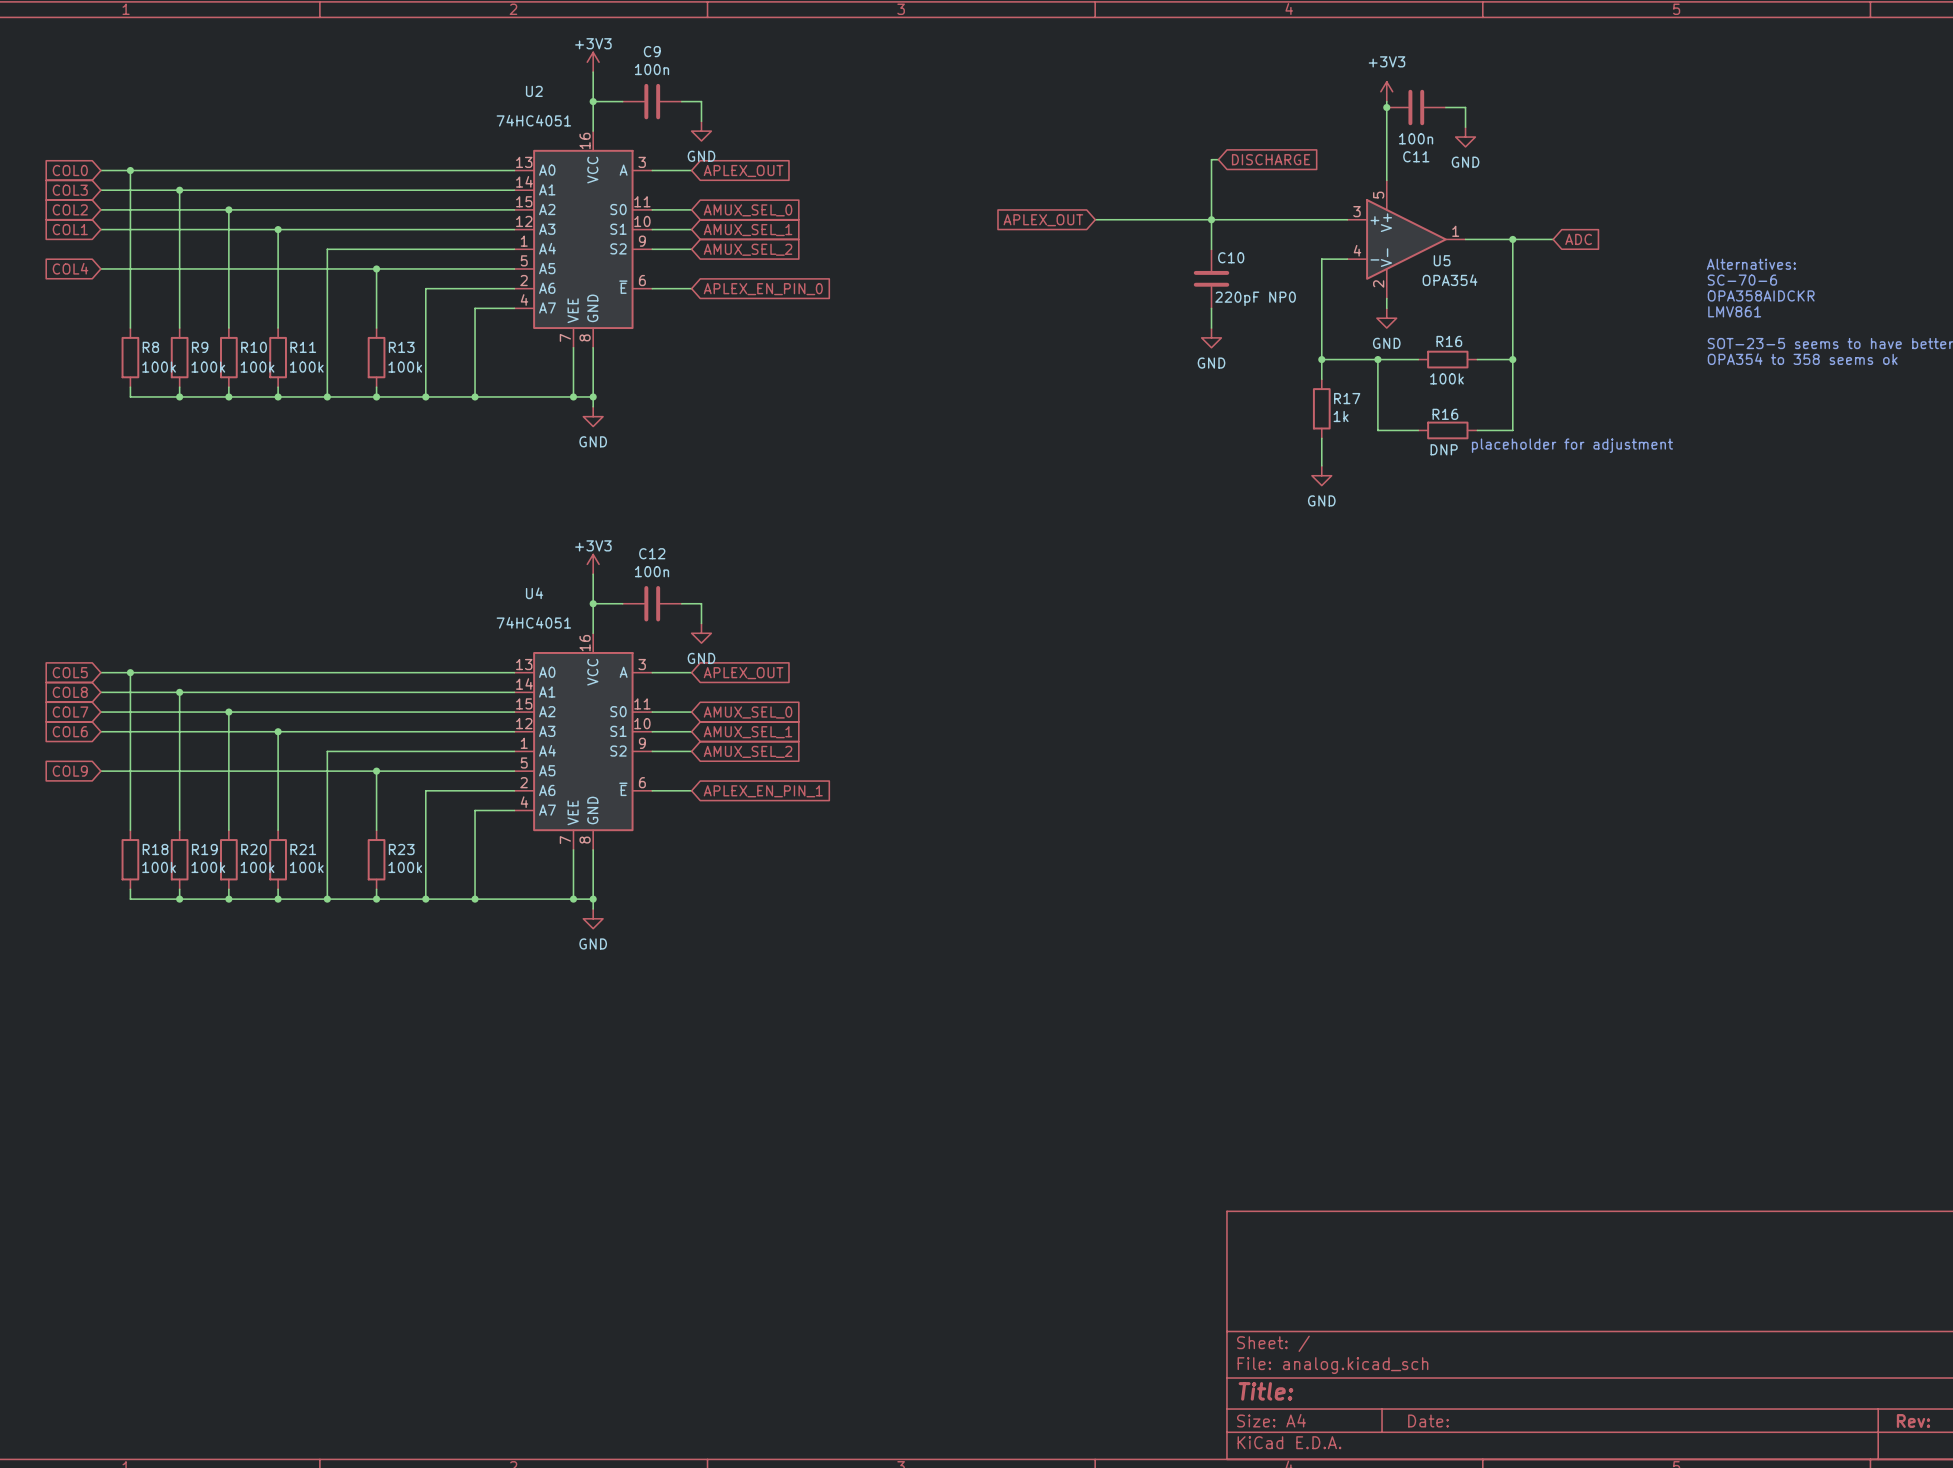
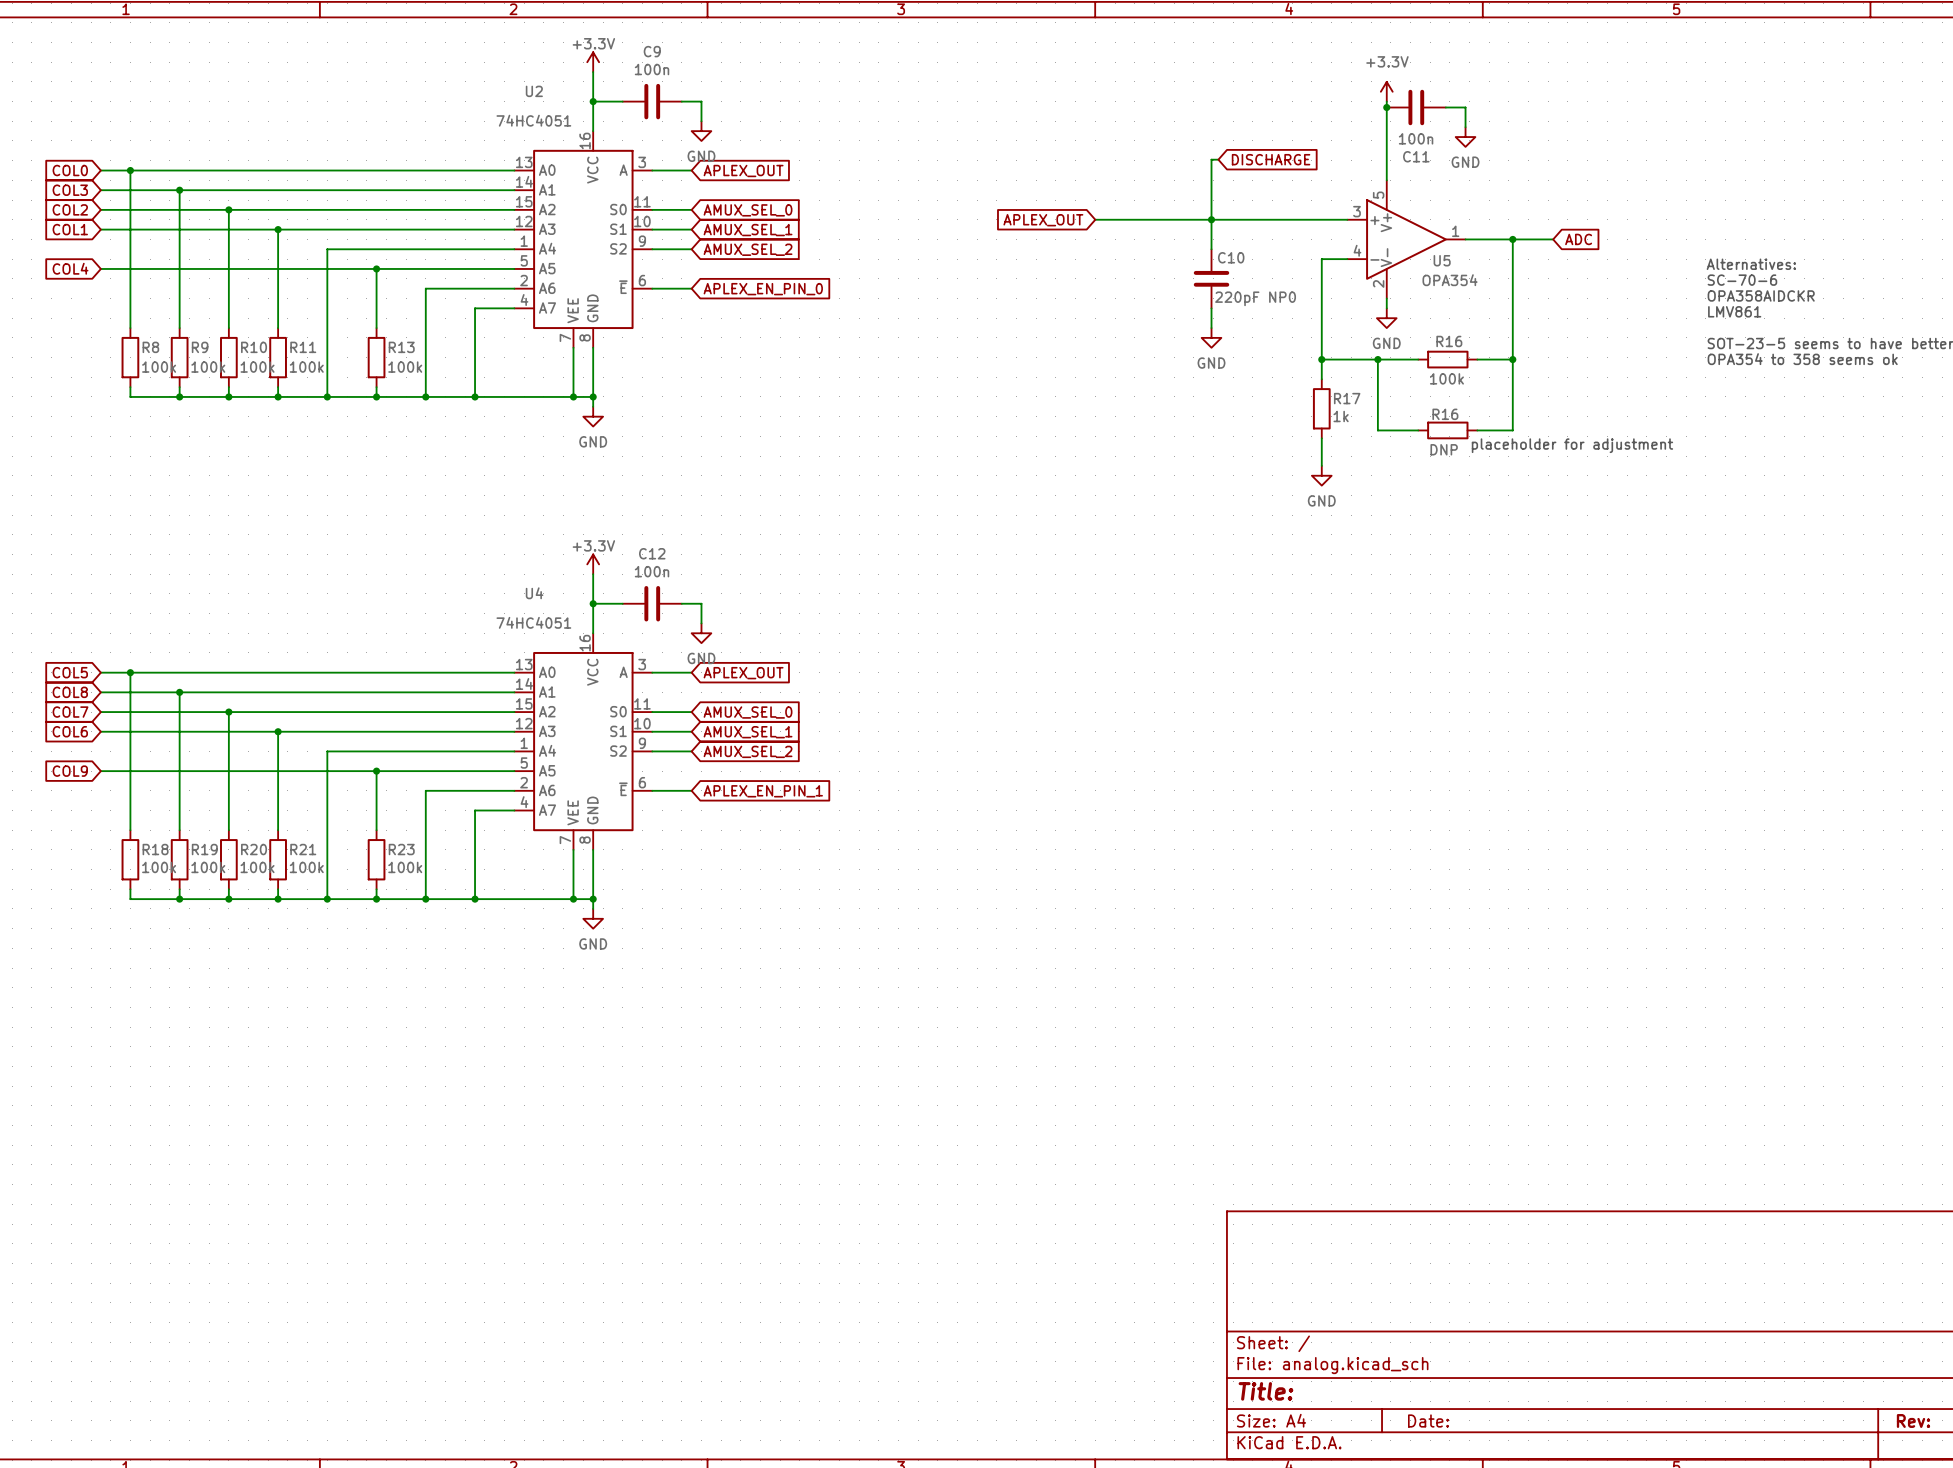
power symbol: +3V3 (593, 62) -> +3.3V (593, 62)
power symbol: +3V3 (1386, 91) -> +3.3V (1386, 91)
power symbol: +3V3 (593, 564) -> +3.3V (593, 564)

